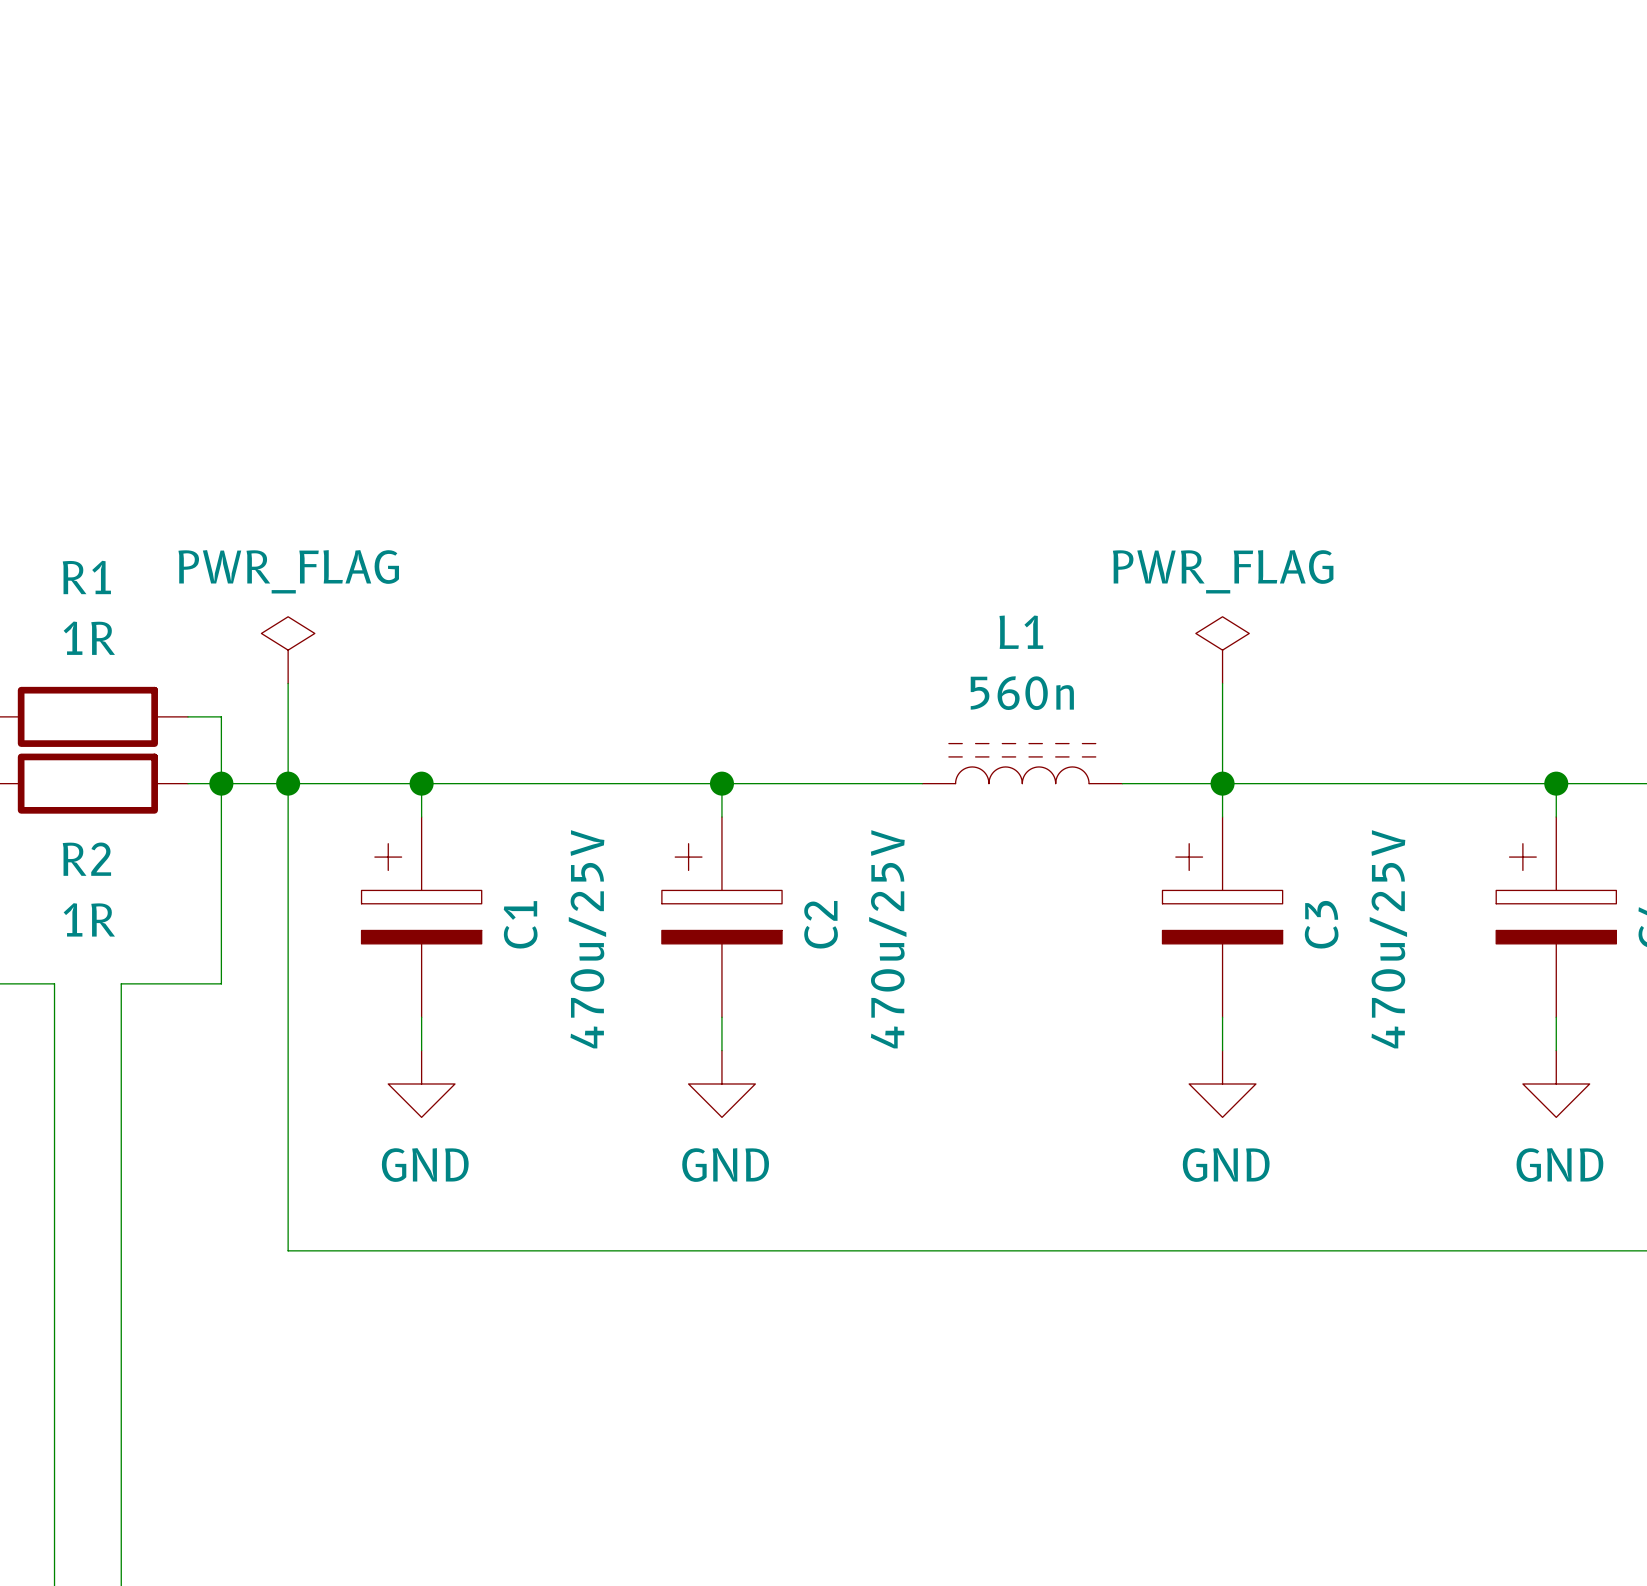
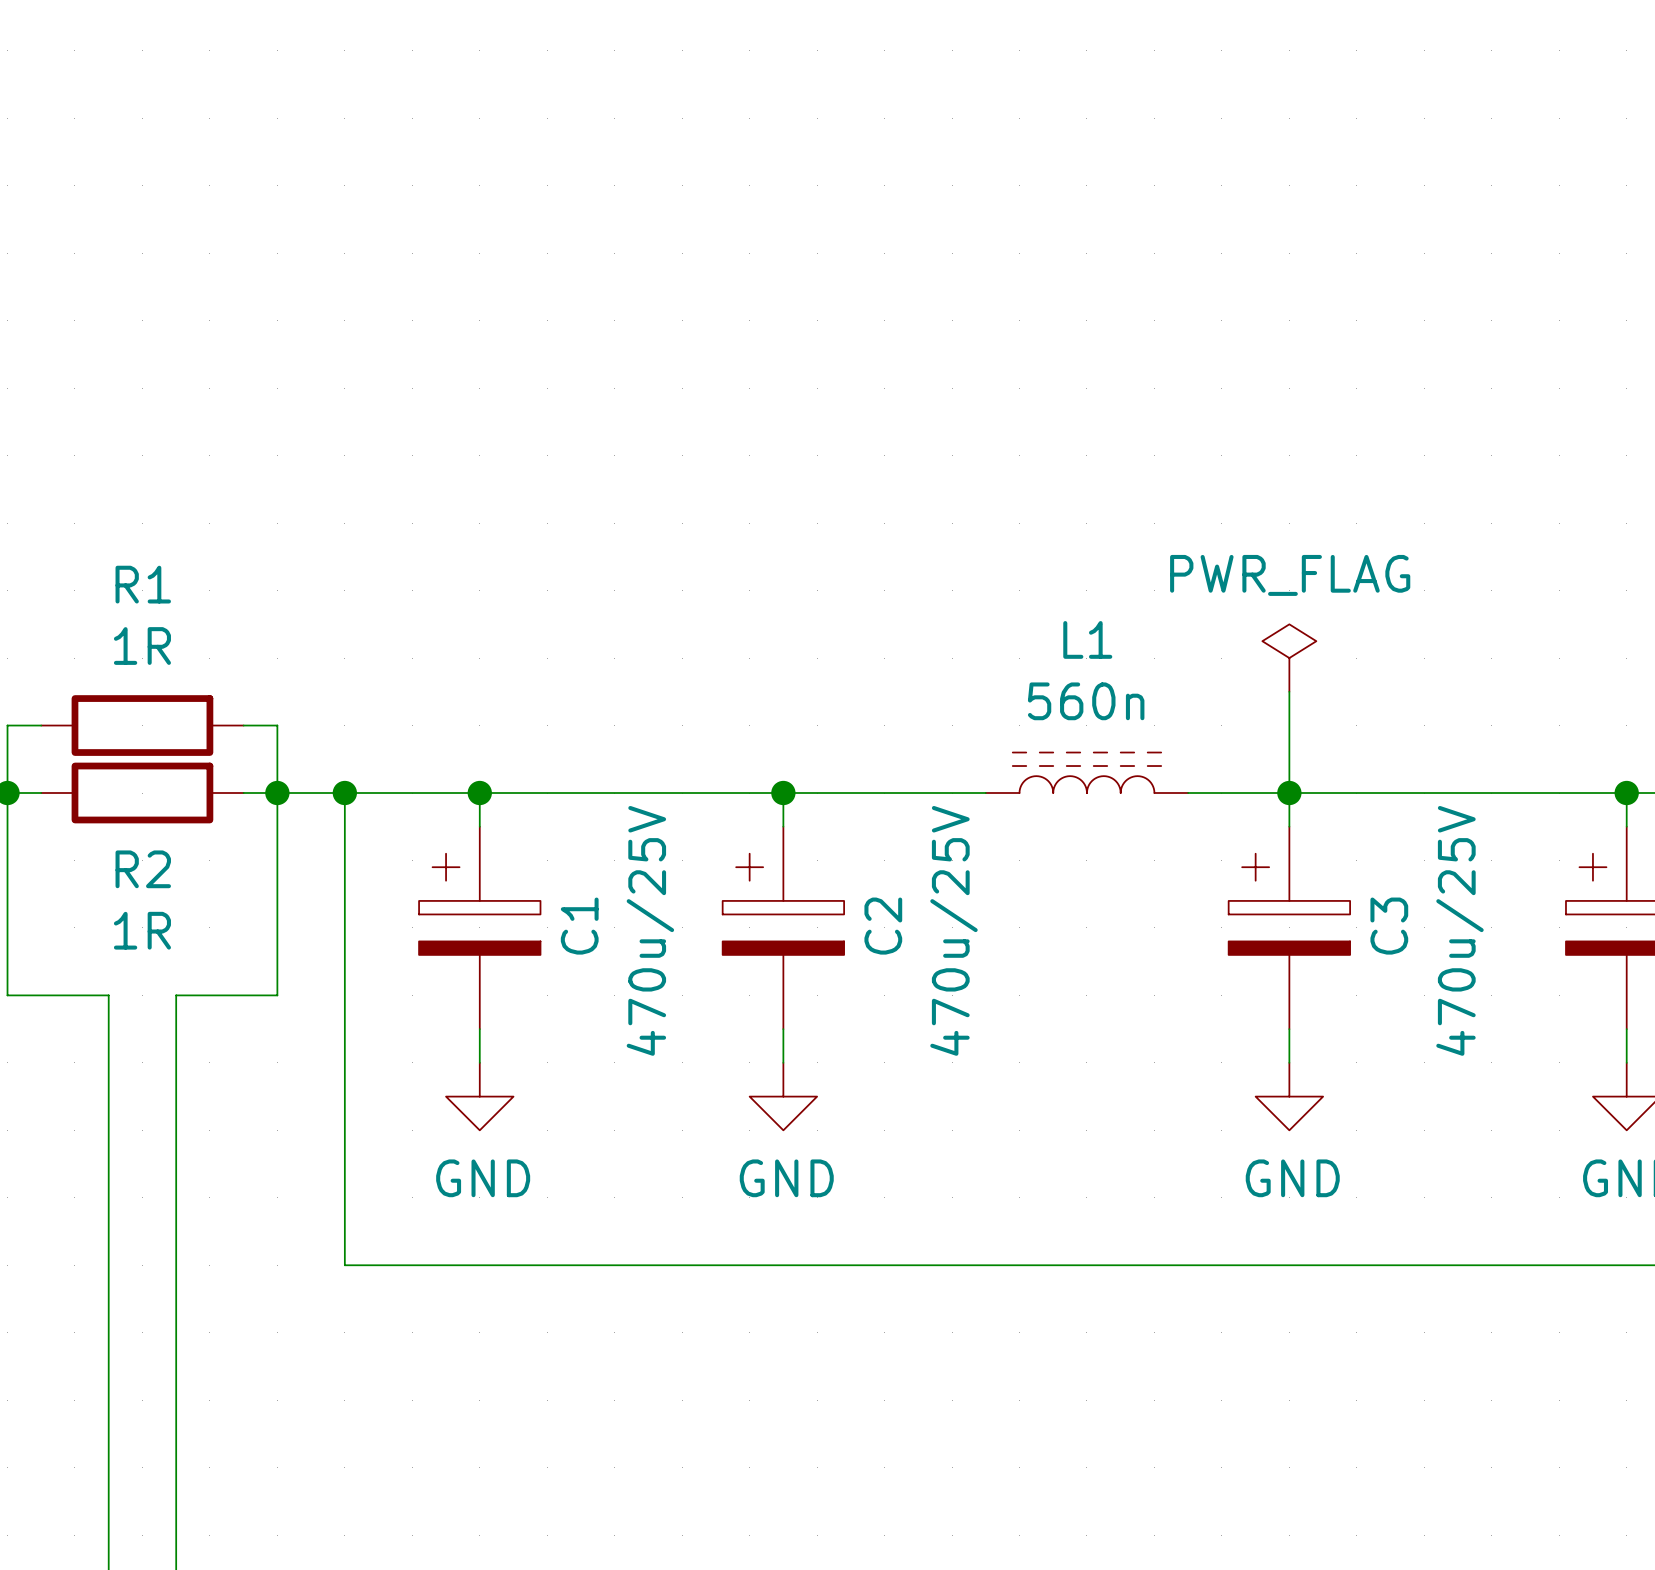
power symbol: PWR_FLAG (288, 650) -> none
wire: (288, 683) (288, 783) -> none

